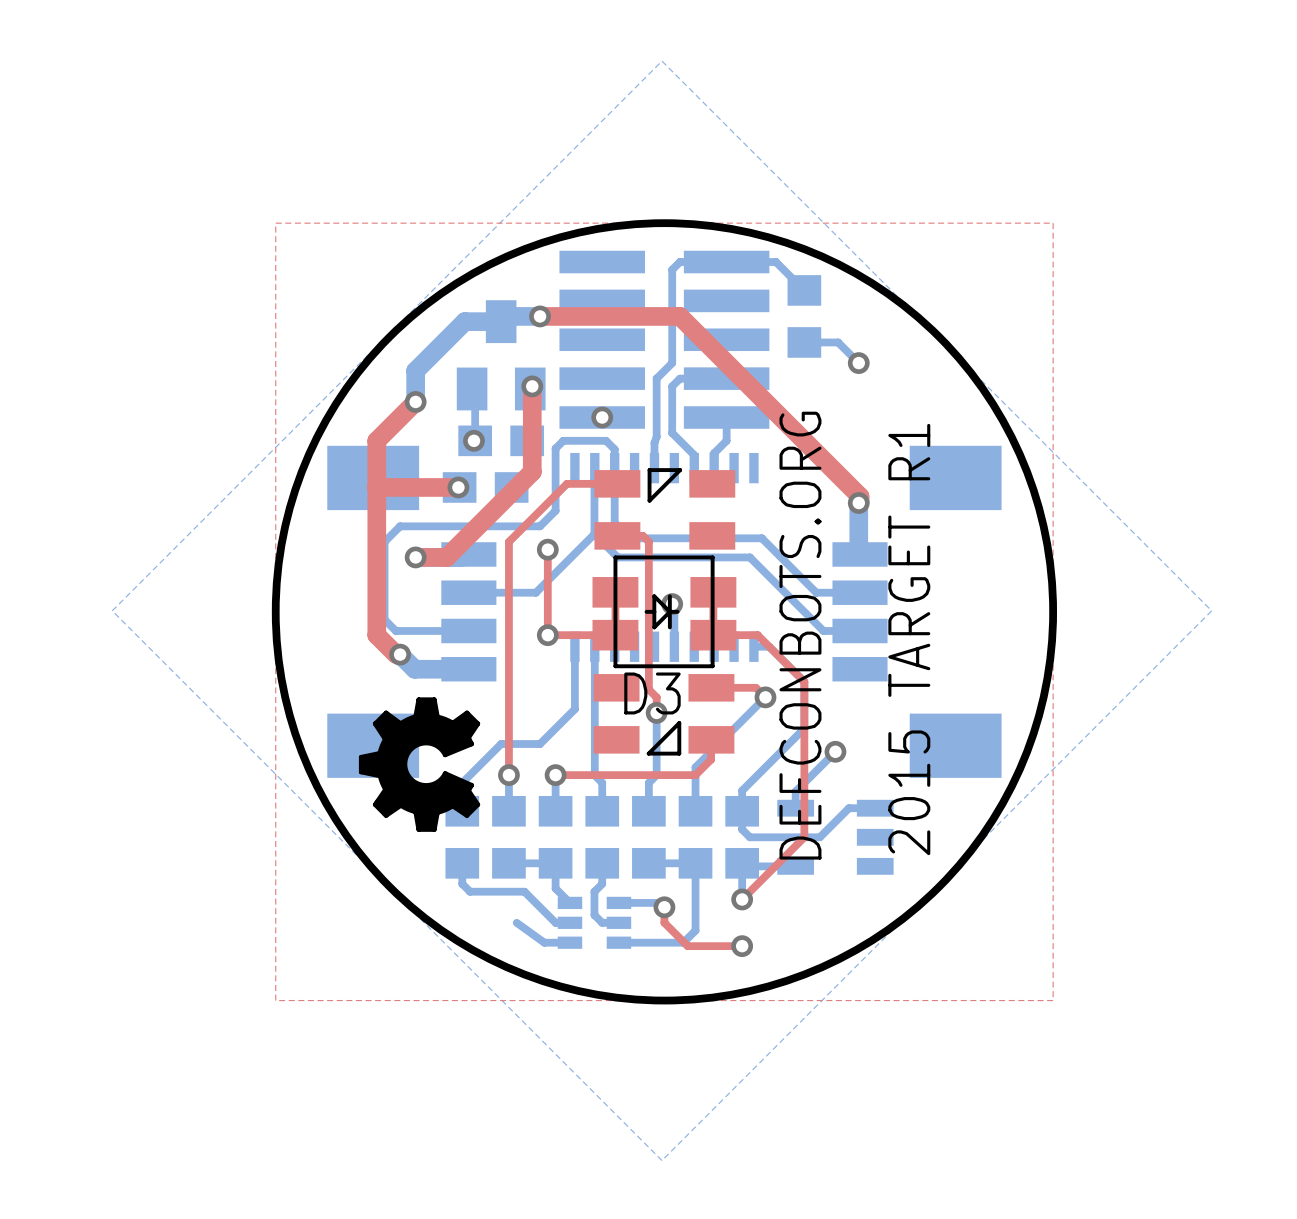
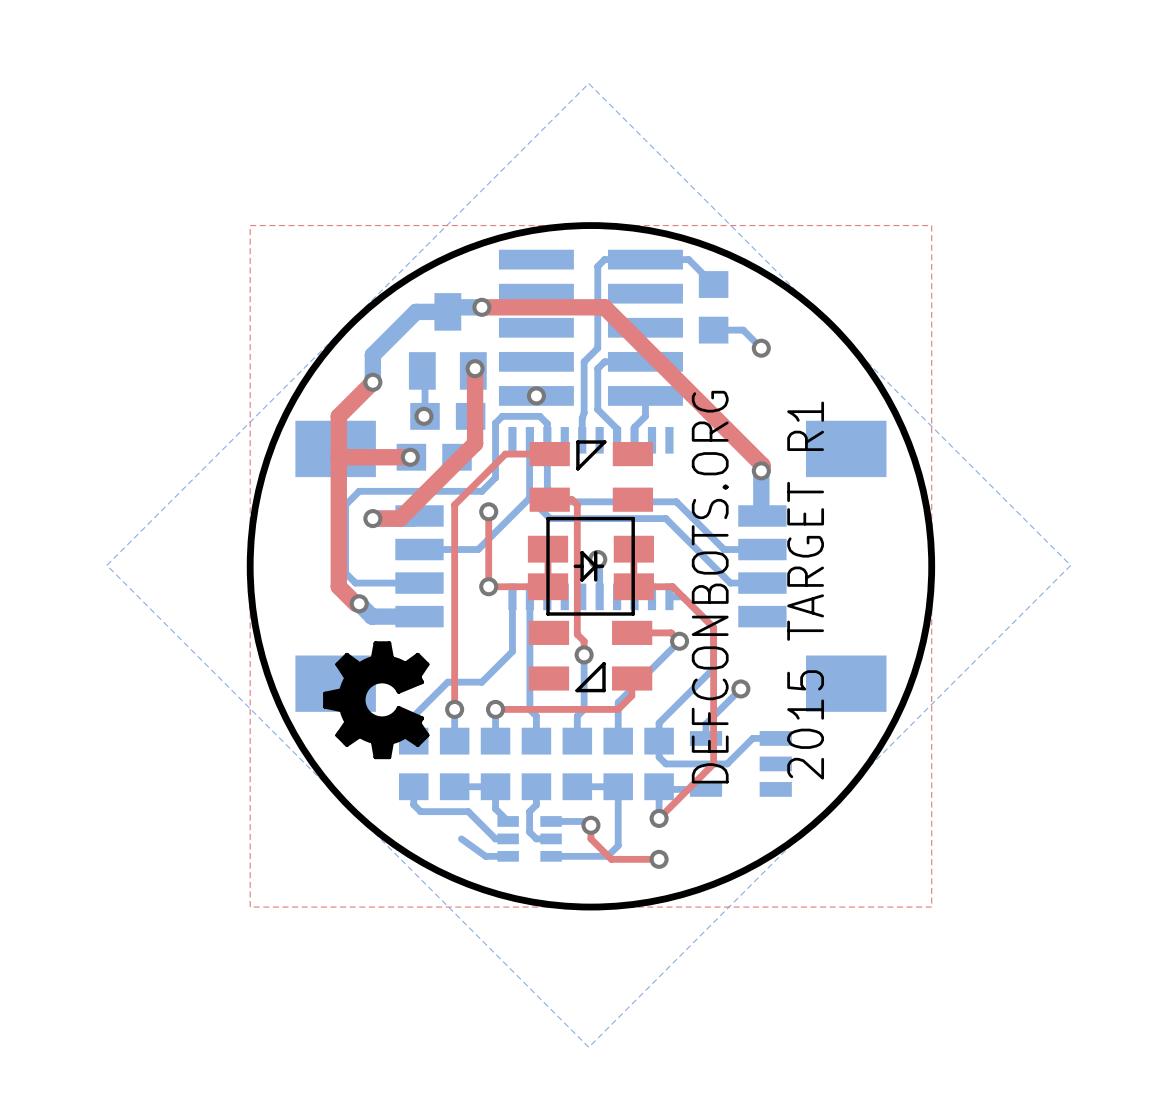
D3 name: D3 (652, 693) -> none

